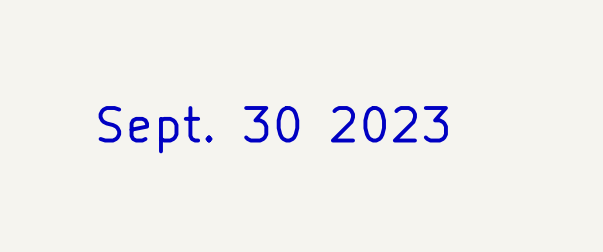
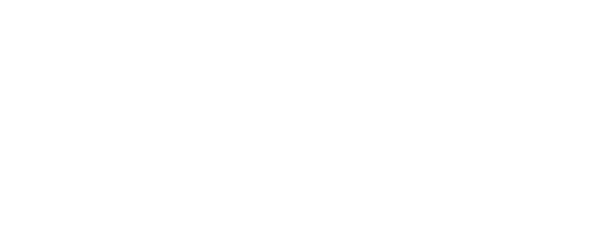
text: Sept. 30 2023 (273, 129) -> none

